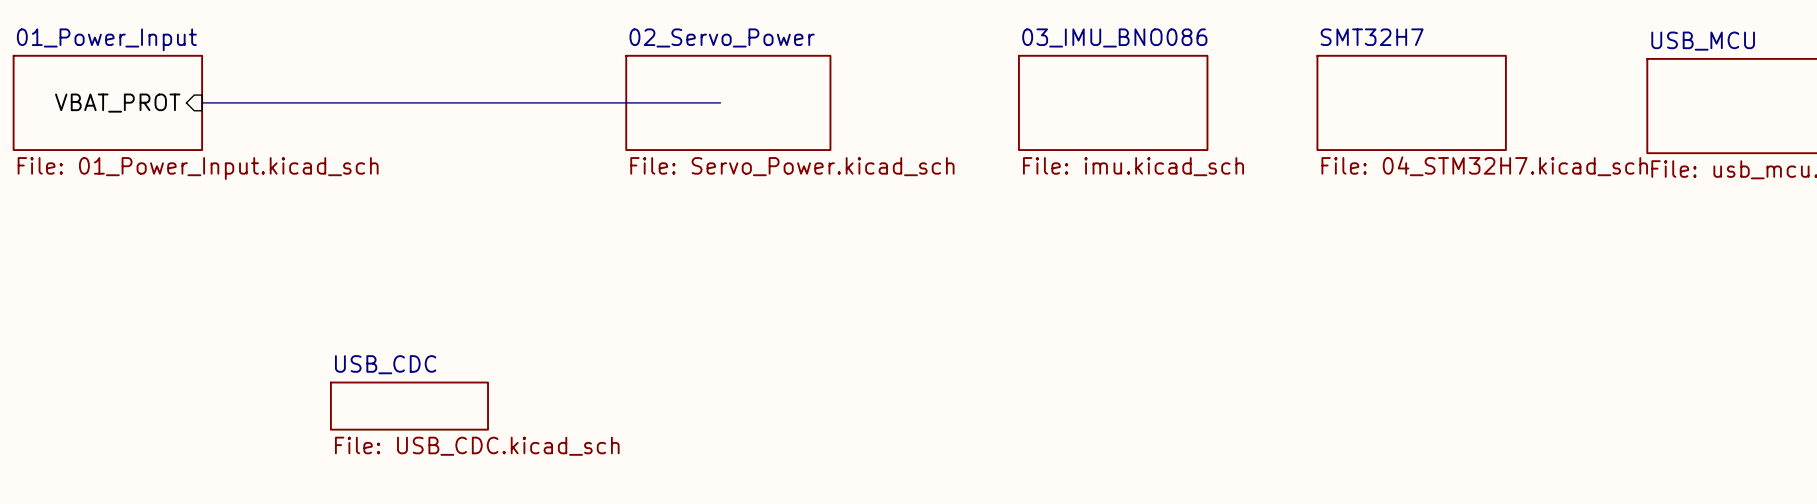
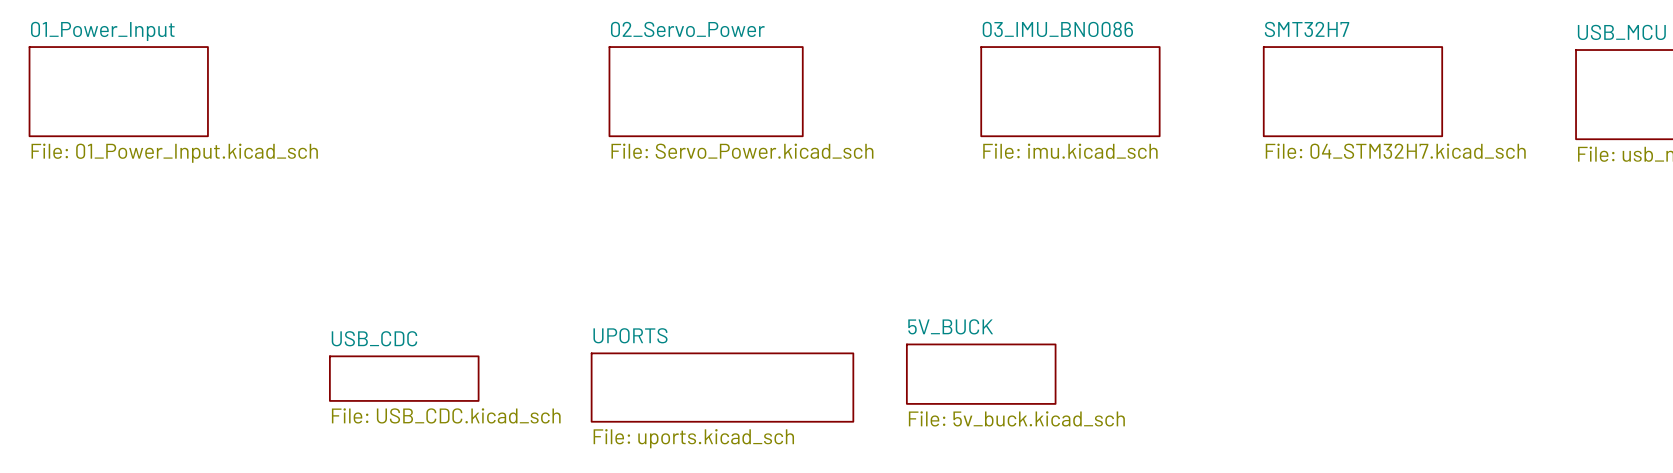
wire: (202, 102) (720, 102) -> none
sheet pin: VBAT_PROT (117, 103) -> none
sheet 5V_BUCK: none -> File: 5v_buck.kicad_sch (981, 374)
sheet UPORTS: none -> File: uports.kicad_sch (722, 387)

